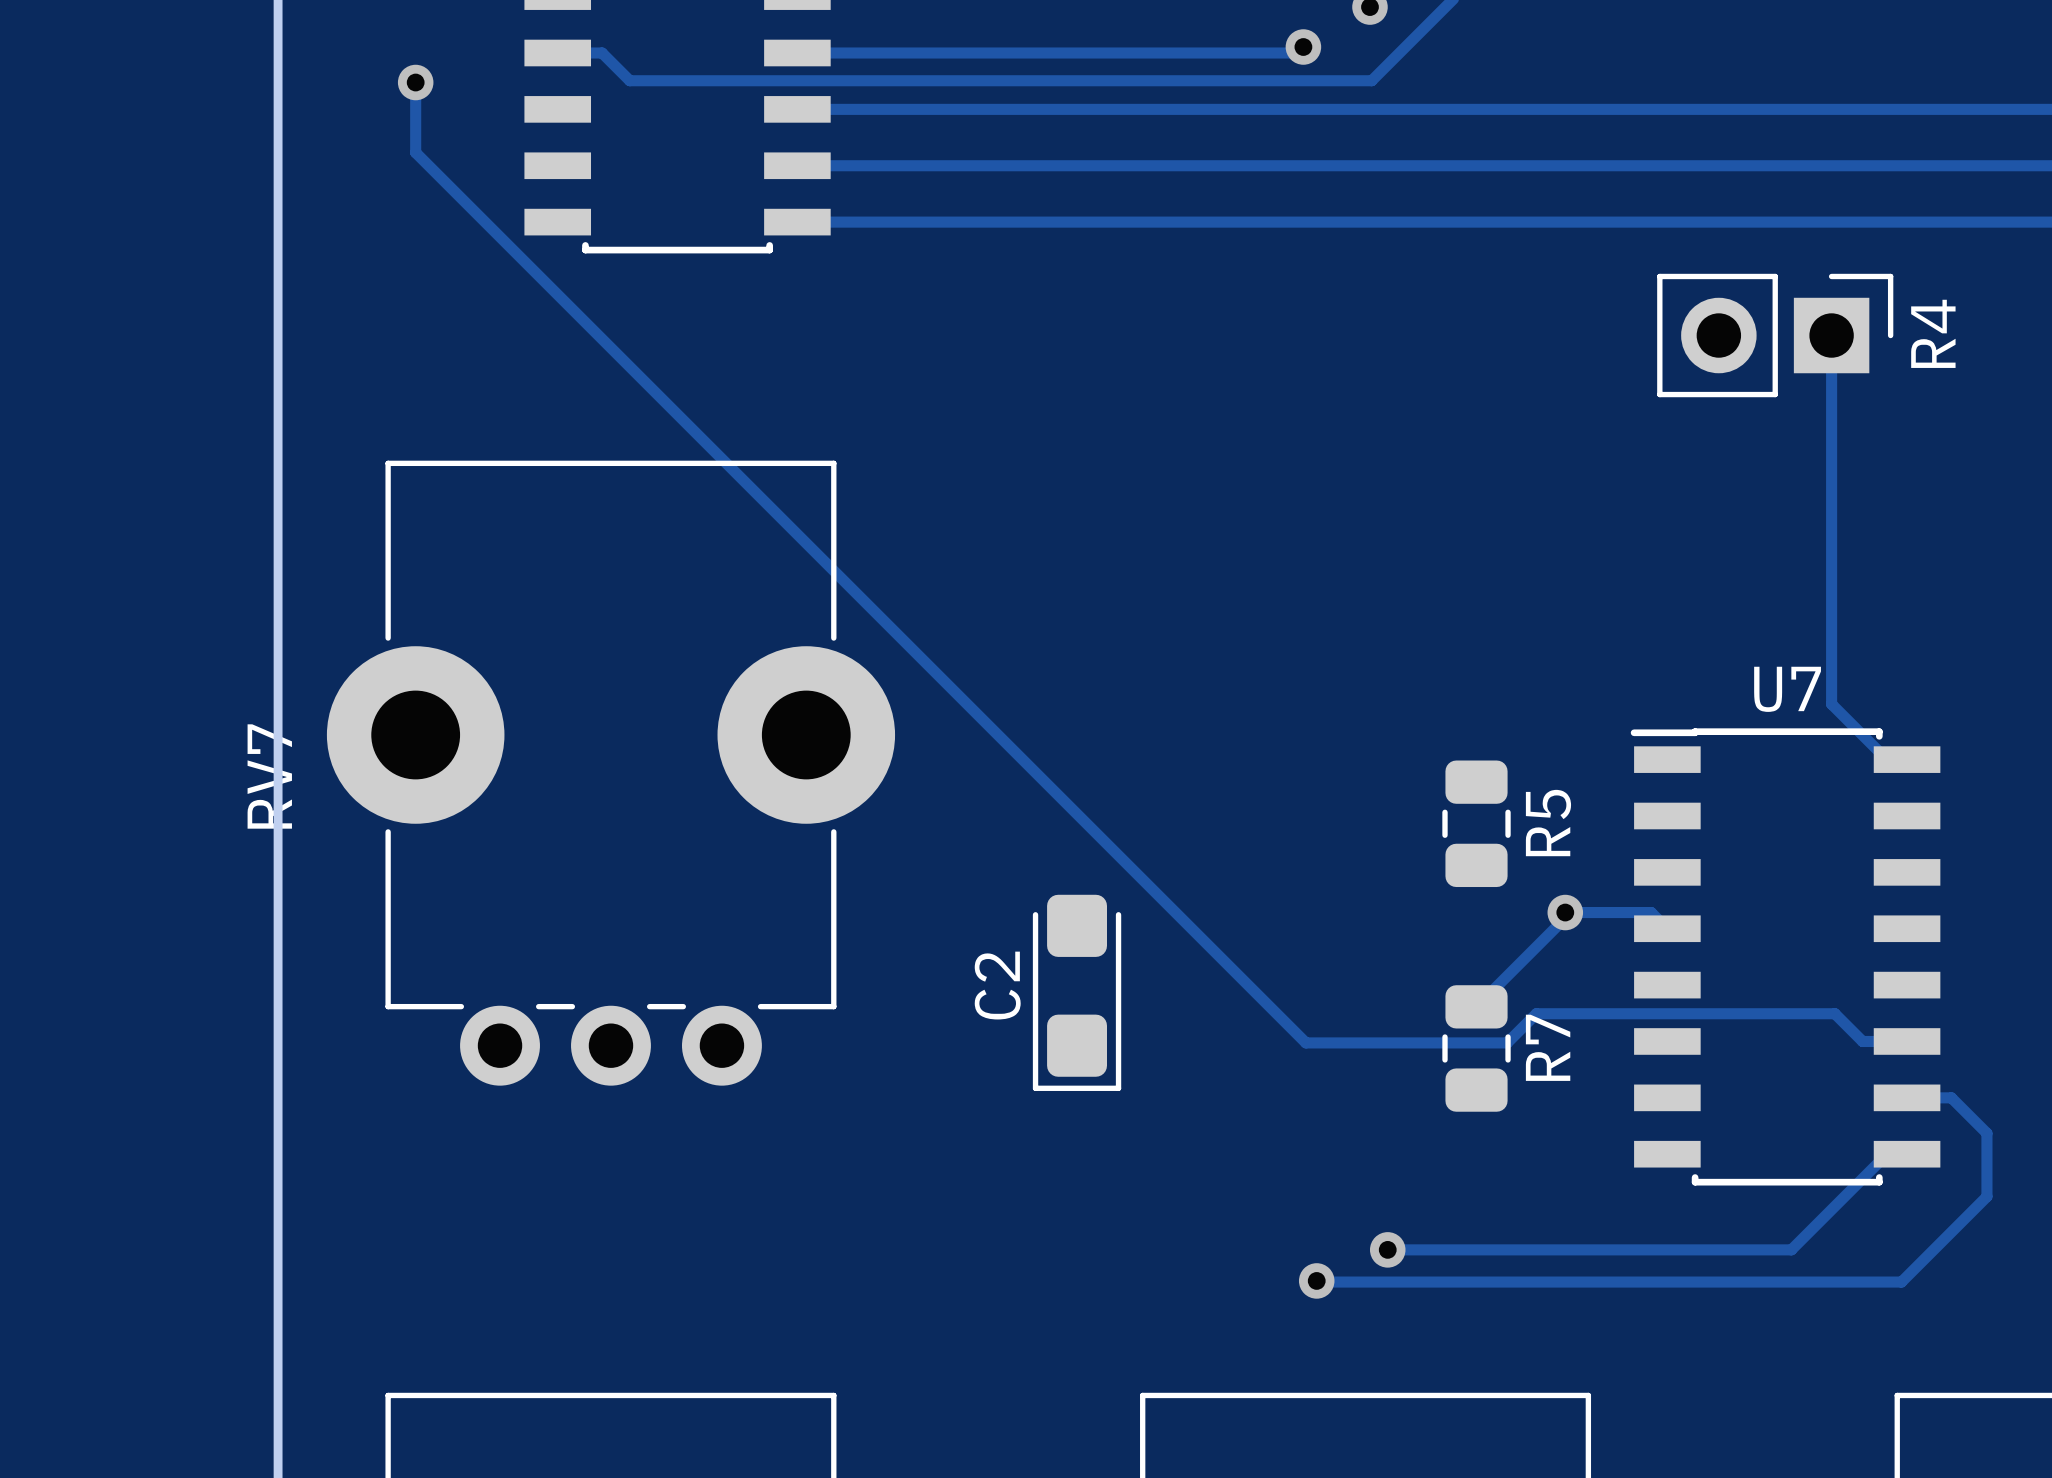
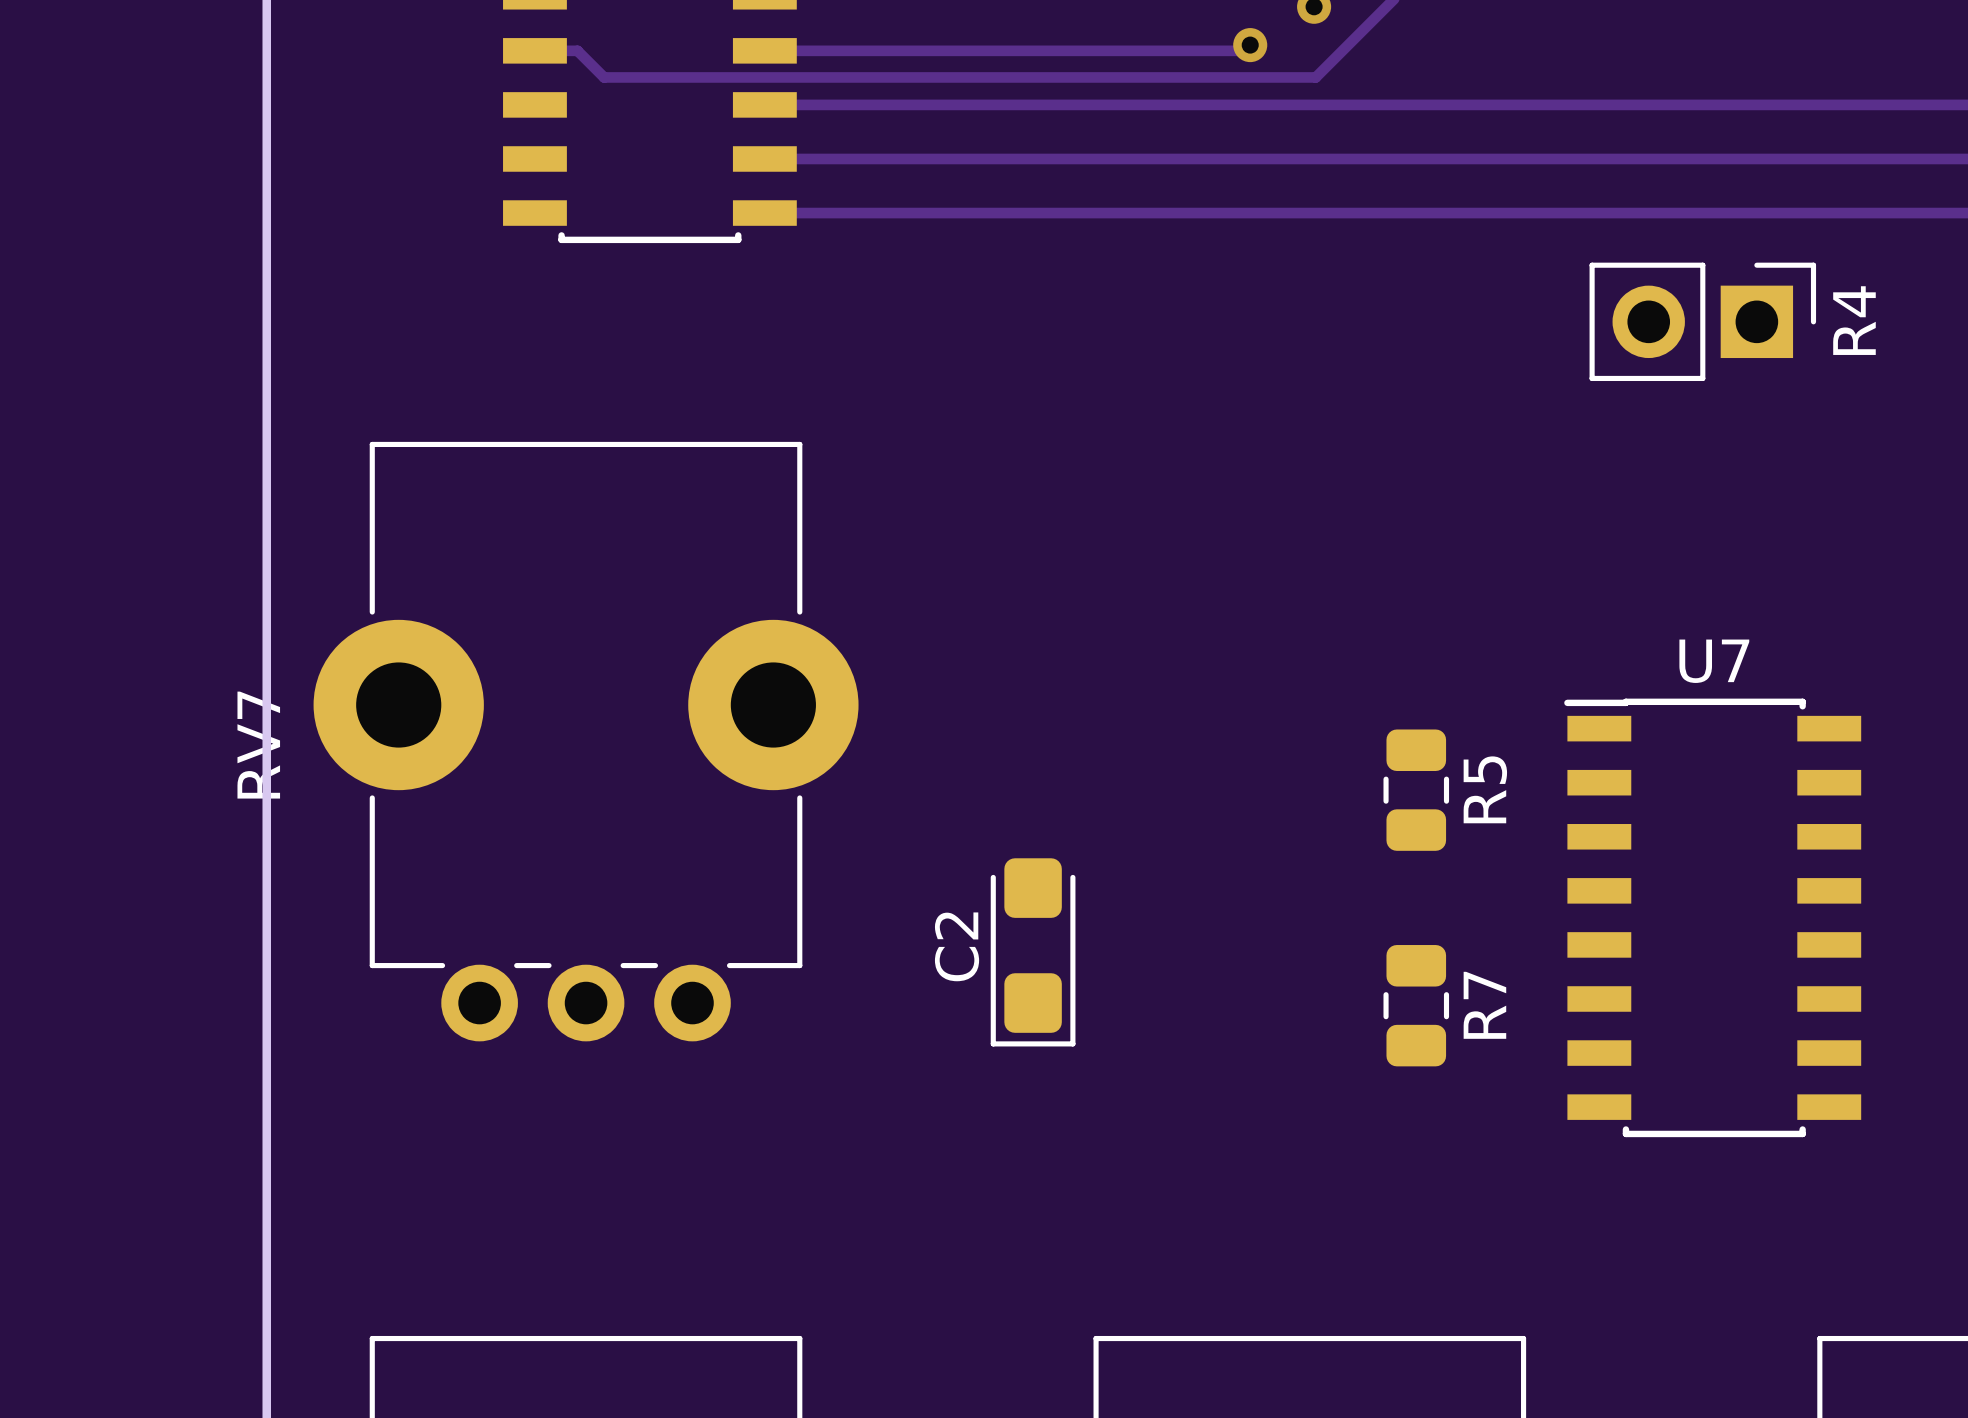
track: (415, 82) (415, 152) (1305, 1042) (1507, 1042) (1536, 1013) (1834, 1013) (1862, 1041) (1907, 1041) -> none
via: (415, 82) -> none
track: (1831, 335) (1831, 704) (1887, 759) (1907, 759) -> none
via: (1565, 912) -> none
track: (1667, 928) (1651, 912) (1565, 912) (1565, 918) (1476, 1006) -> none
track: (1907, 1097) (1951, 1097) (1986, 1133) (1986, 1196) (1901, 1282) (1316, 1280) -> none
track: (1907, 1154) (1887, 1154) (1791, 1249) (1387, 1249) -> none
via: (1387, 1249) -> none
via: (1316, 1280) -> none

